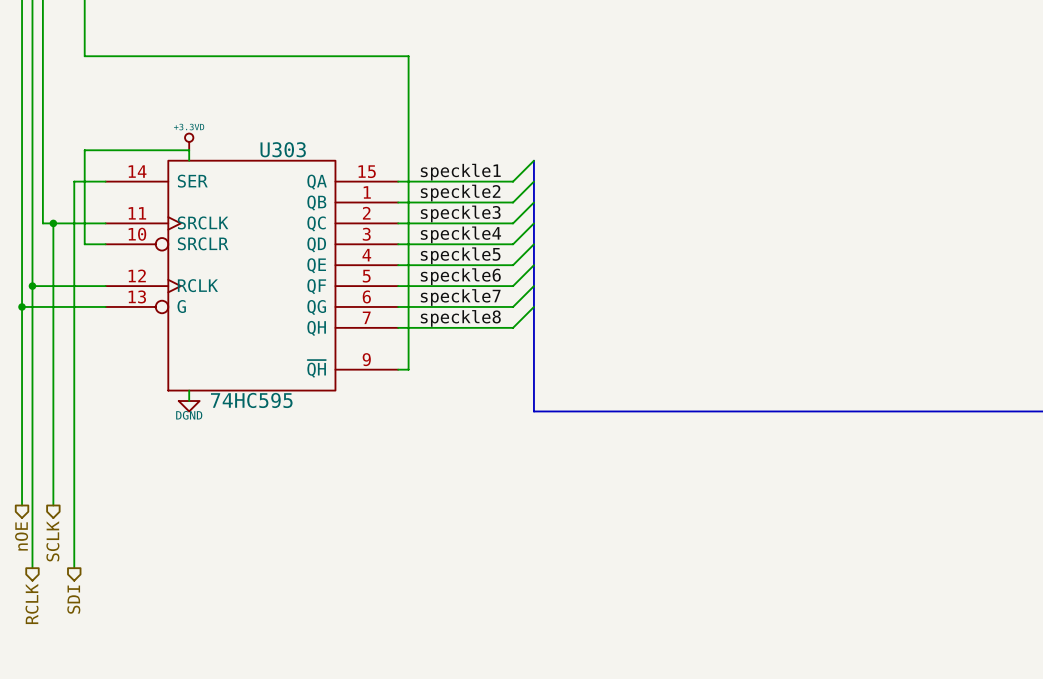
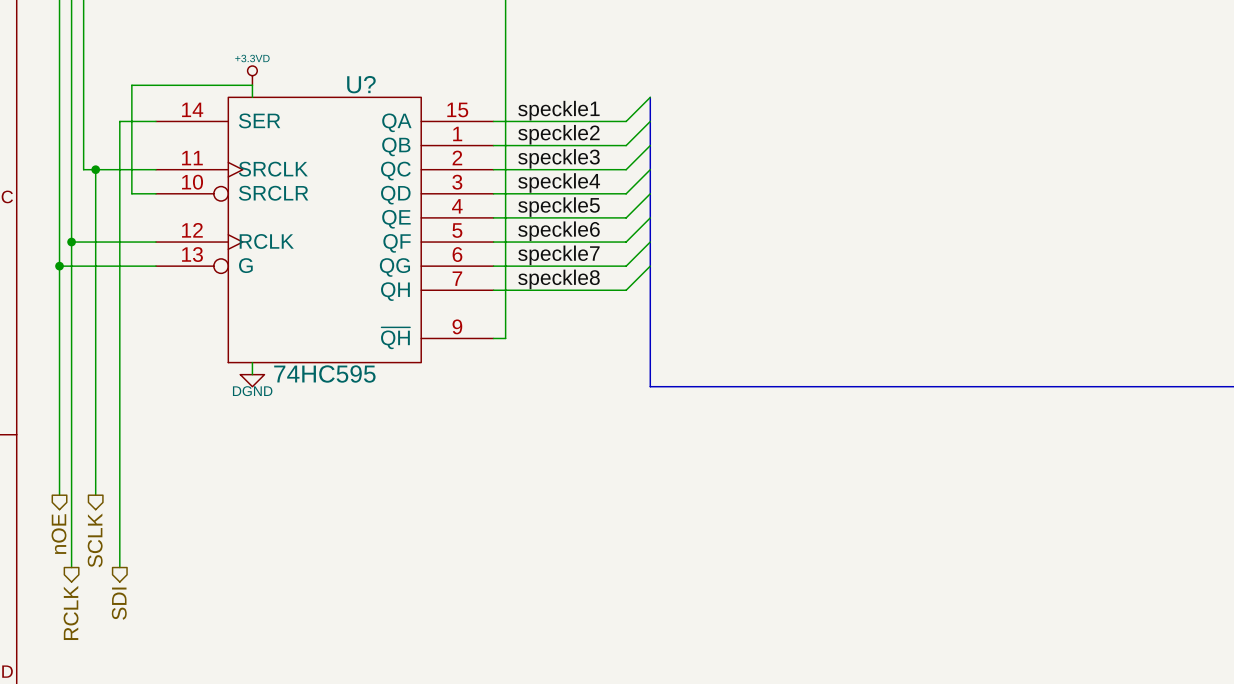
U303 name: U303 (283, 149) -> U? (361, 84)

